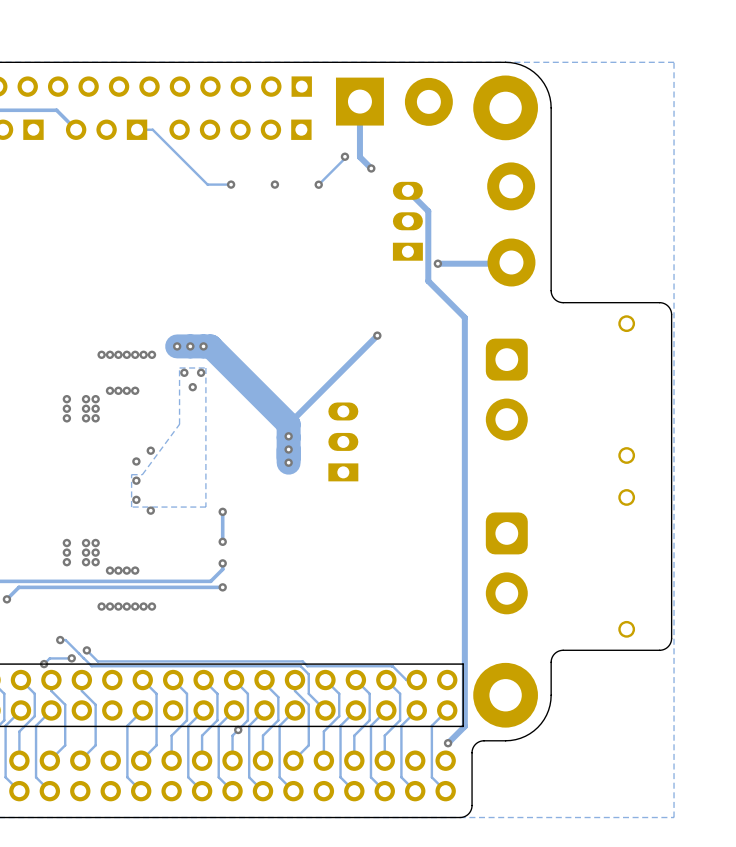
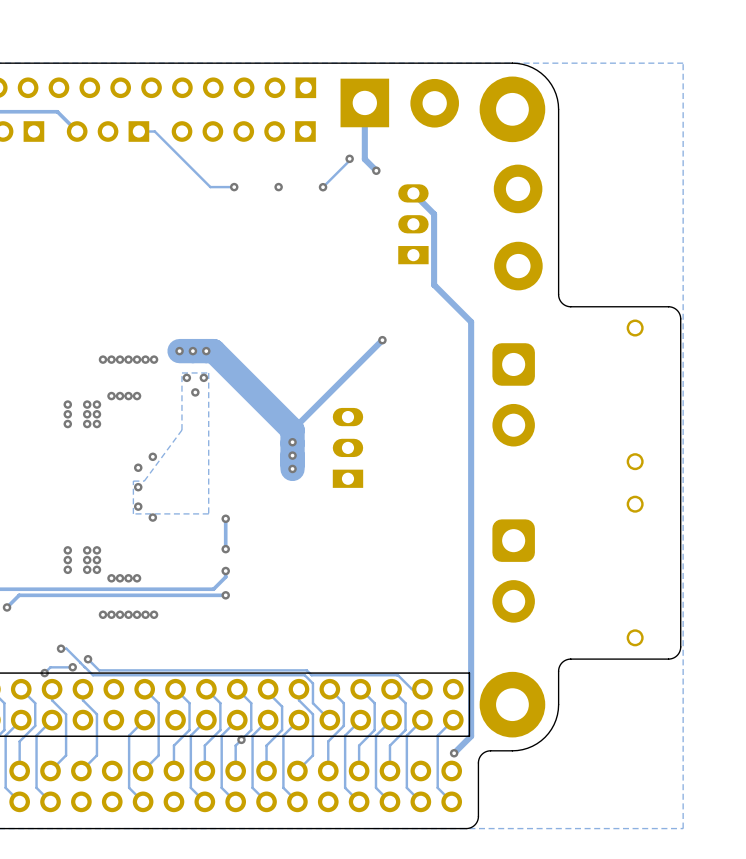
track: (511, 262) (437, 263) -> none
via: (437, 263) -> none

